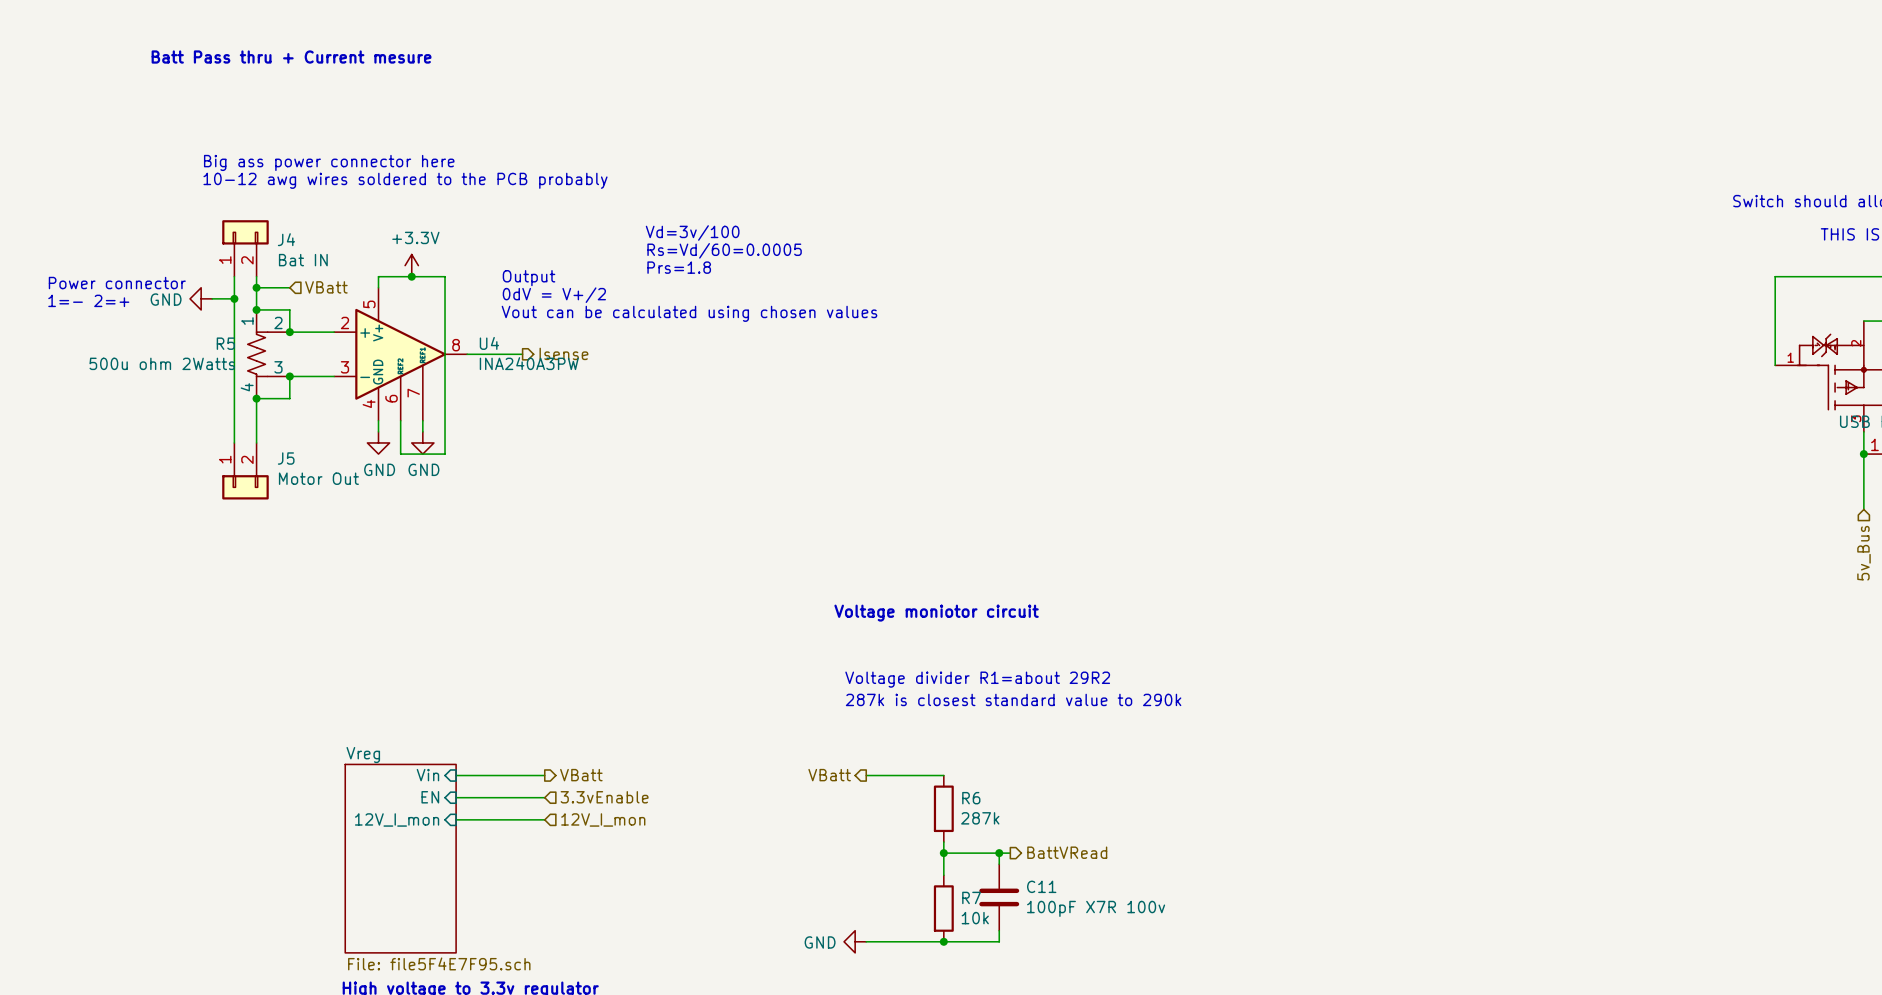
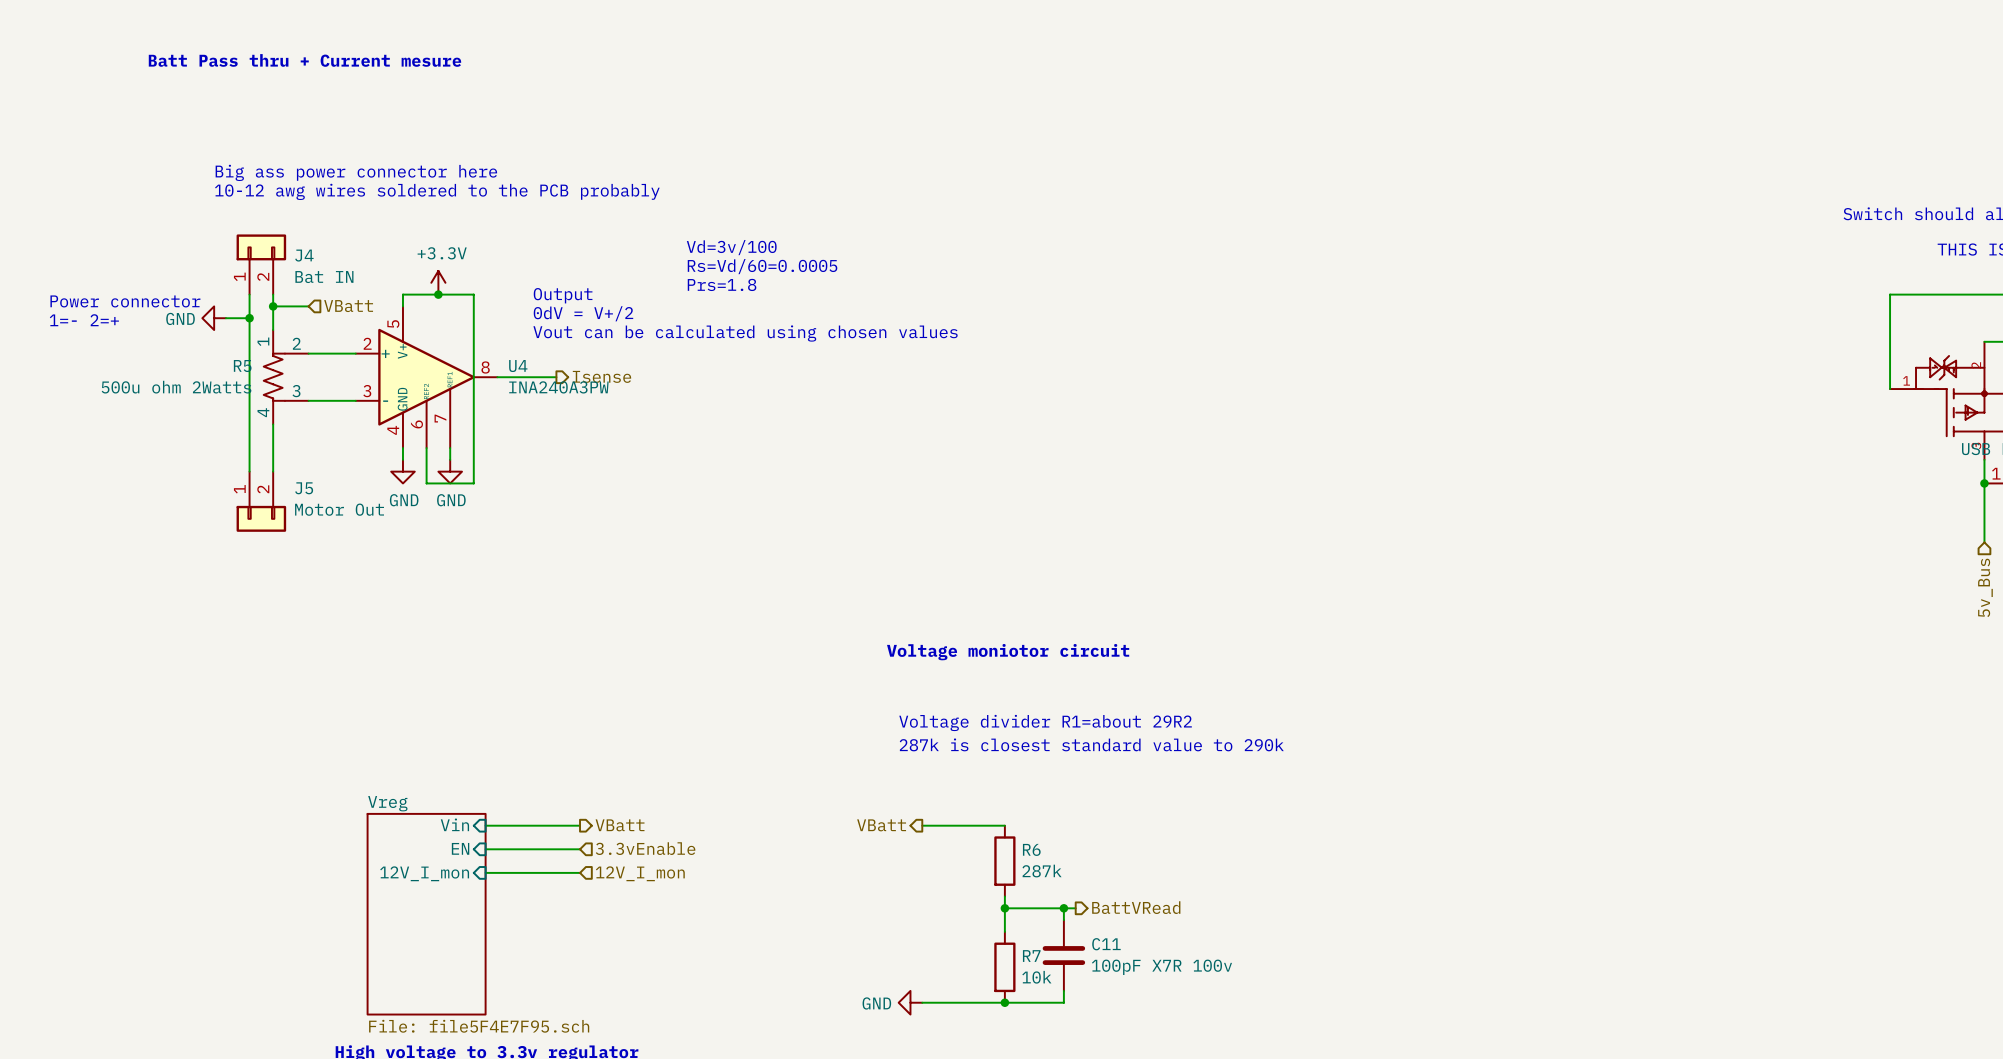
wire: (256, 309) (289, 309) (289, 332) -> none
junction: (256, 309) -> none
junction: (289, 332) -> none
wire: (289, 376) (289, 398) (256, 398) -> none
junction: (289, 376) -> none
junction: (256, 398) -> none

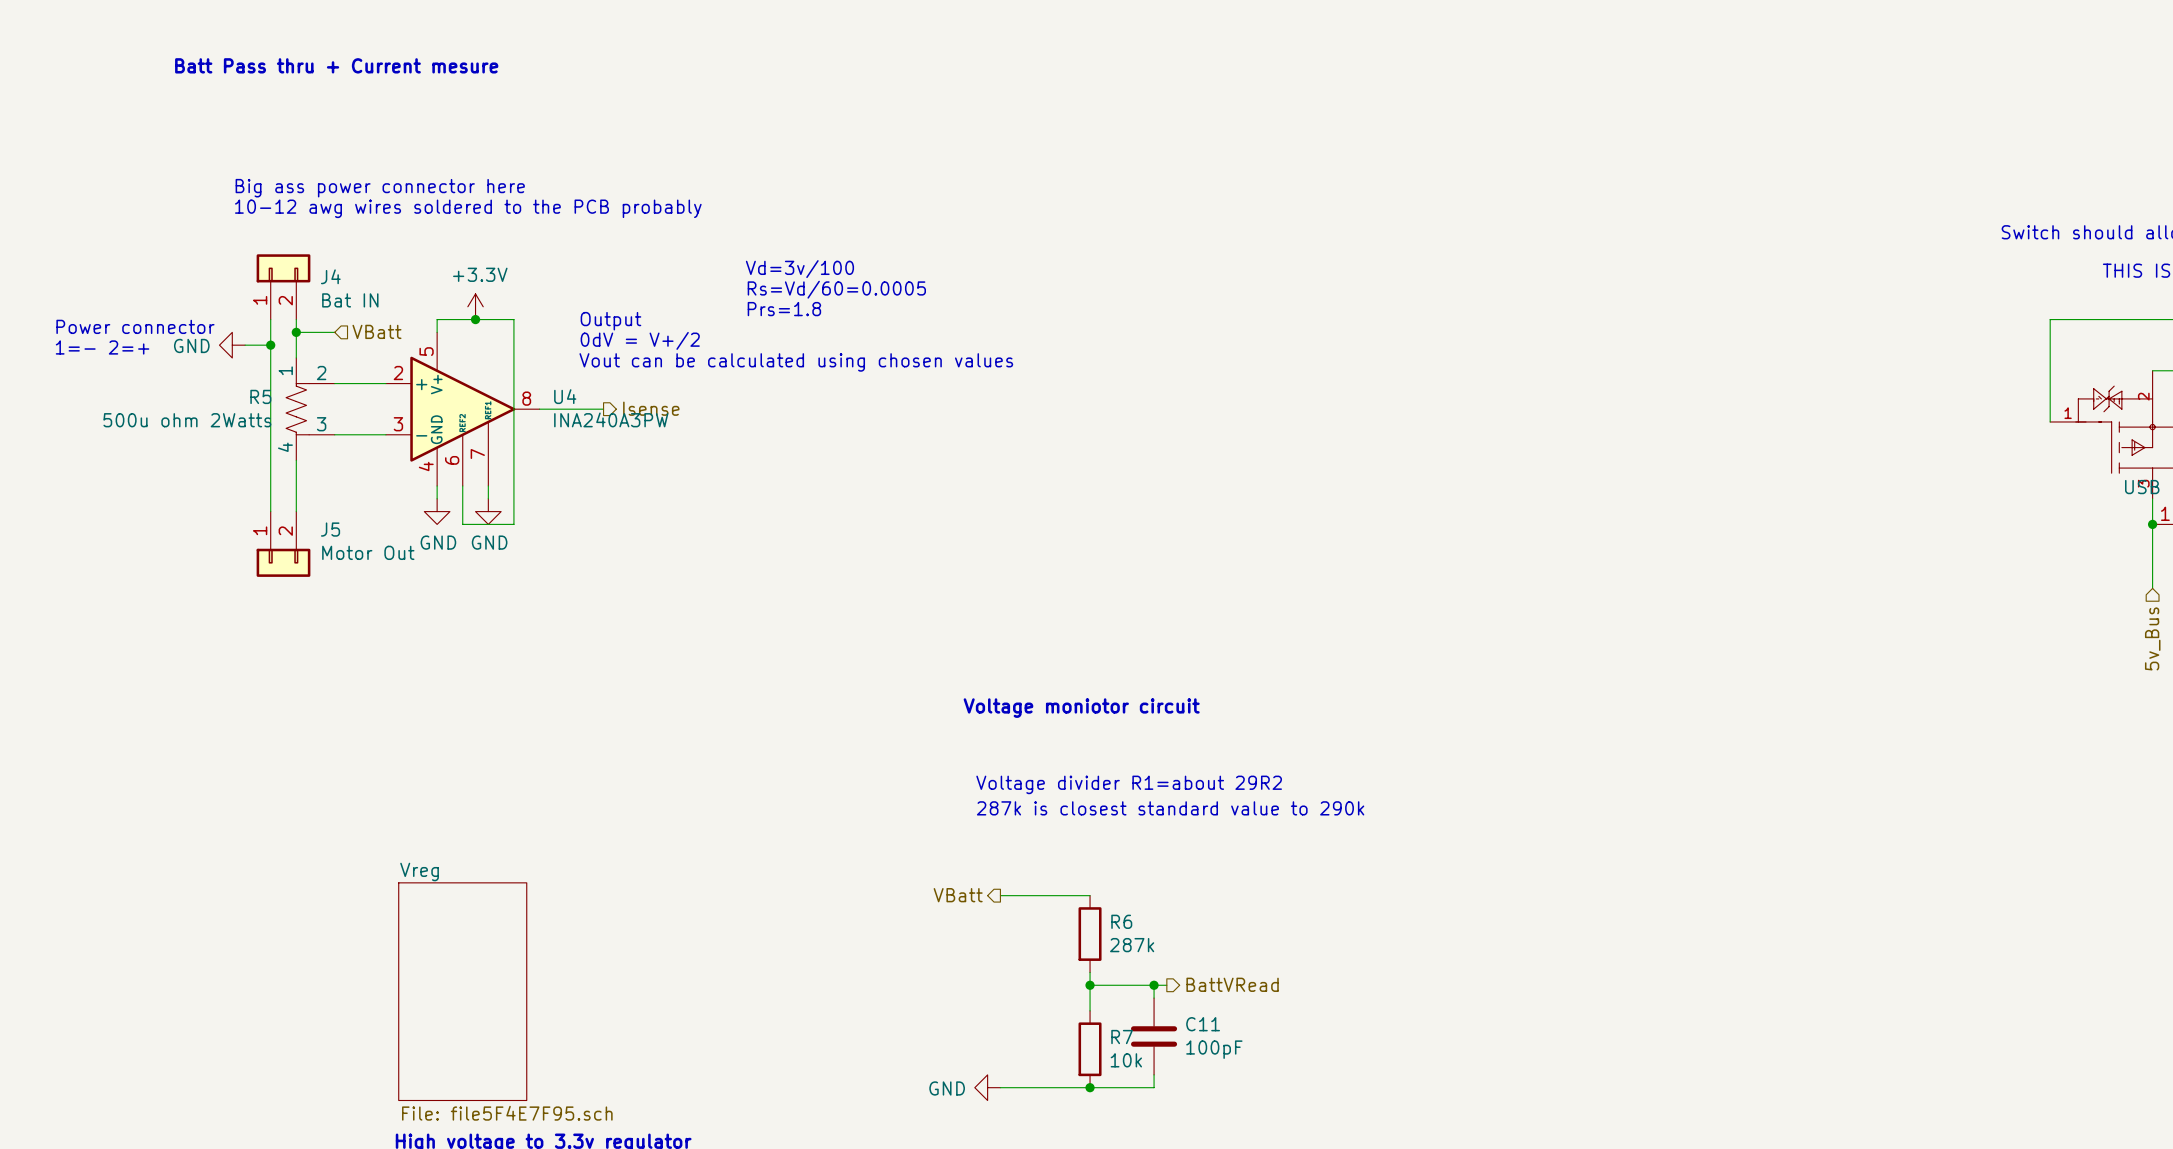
sheet pin: Vin (454, 824) -> none
wire: (485, 825) (580, 825) -> none
hierarchical label: VBatt (620, 825) -> none
sheet pin: EN (460, 848) -> none
hierarchical label: 3.3vEnable (645, 848) -> none
wire: (485, 849) (580, 849) -> none
wire: (485, 872) (580, 872) -> none
sheet pin: 12V_I_mon (424, 873) -> none
hierarchical label: 12V_I_mon (640, 873) -> none
C11 value: 100pF X7R 100v (1161, 967) -> 100pF (1214, 1049)

